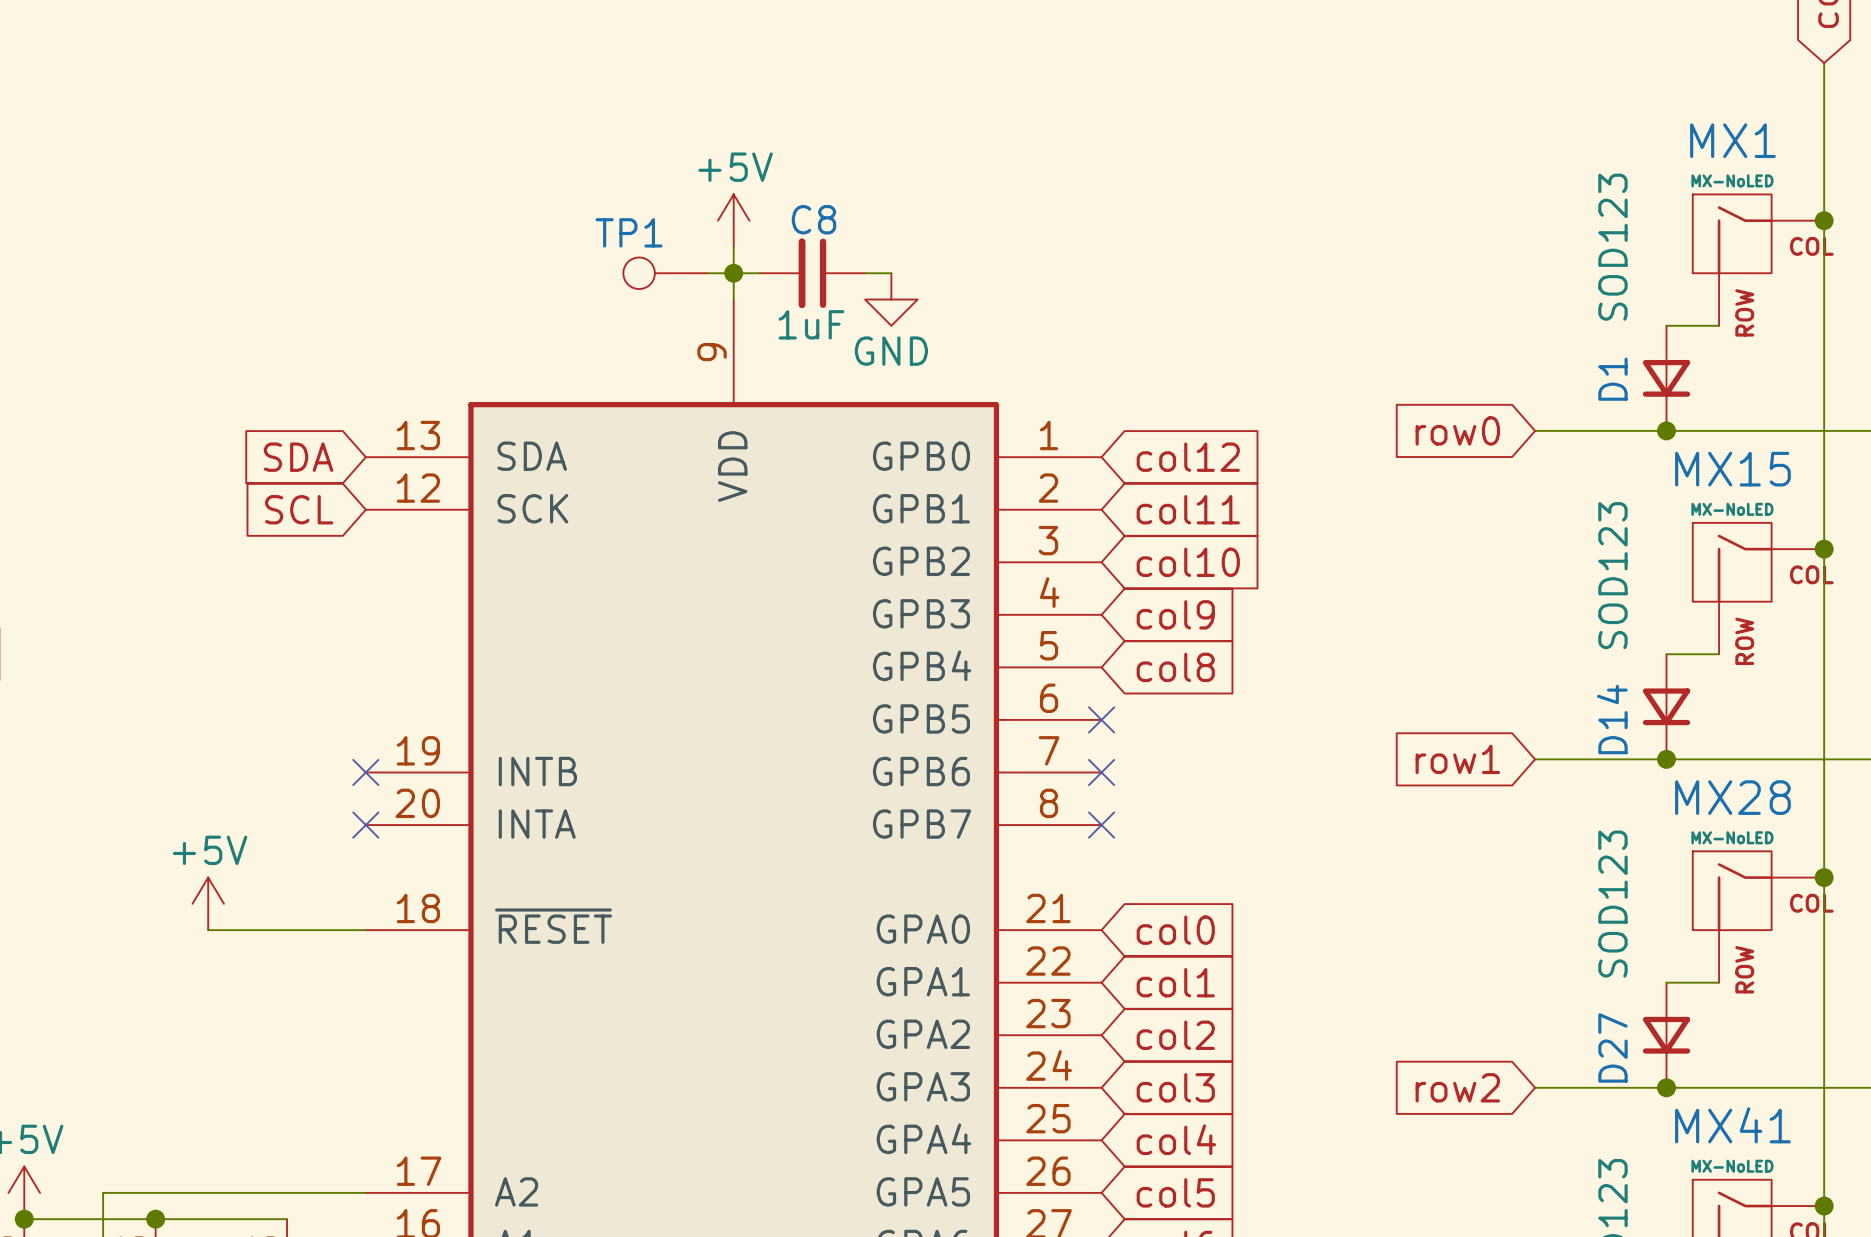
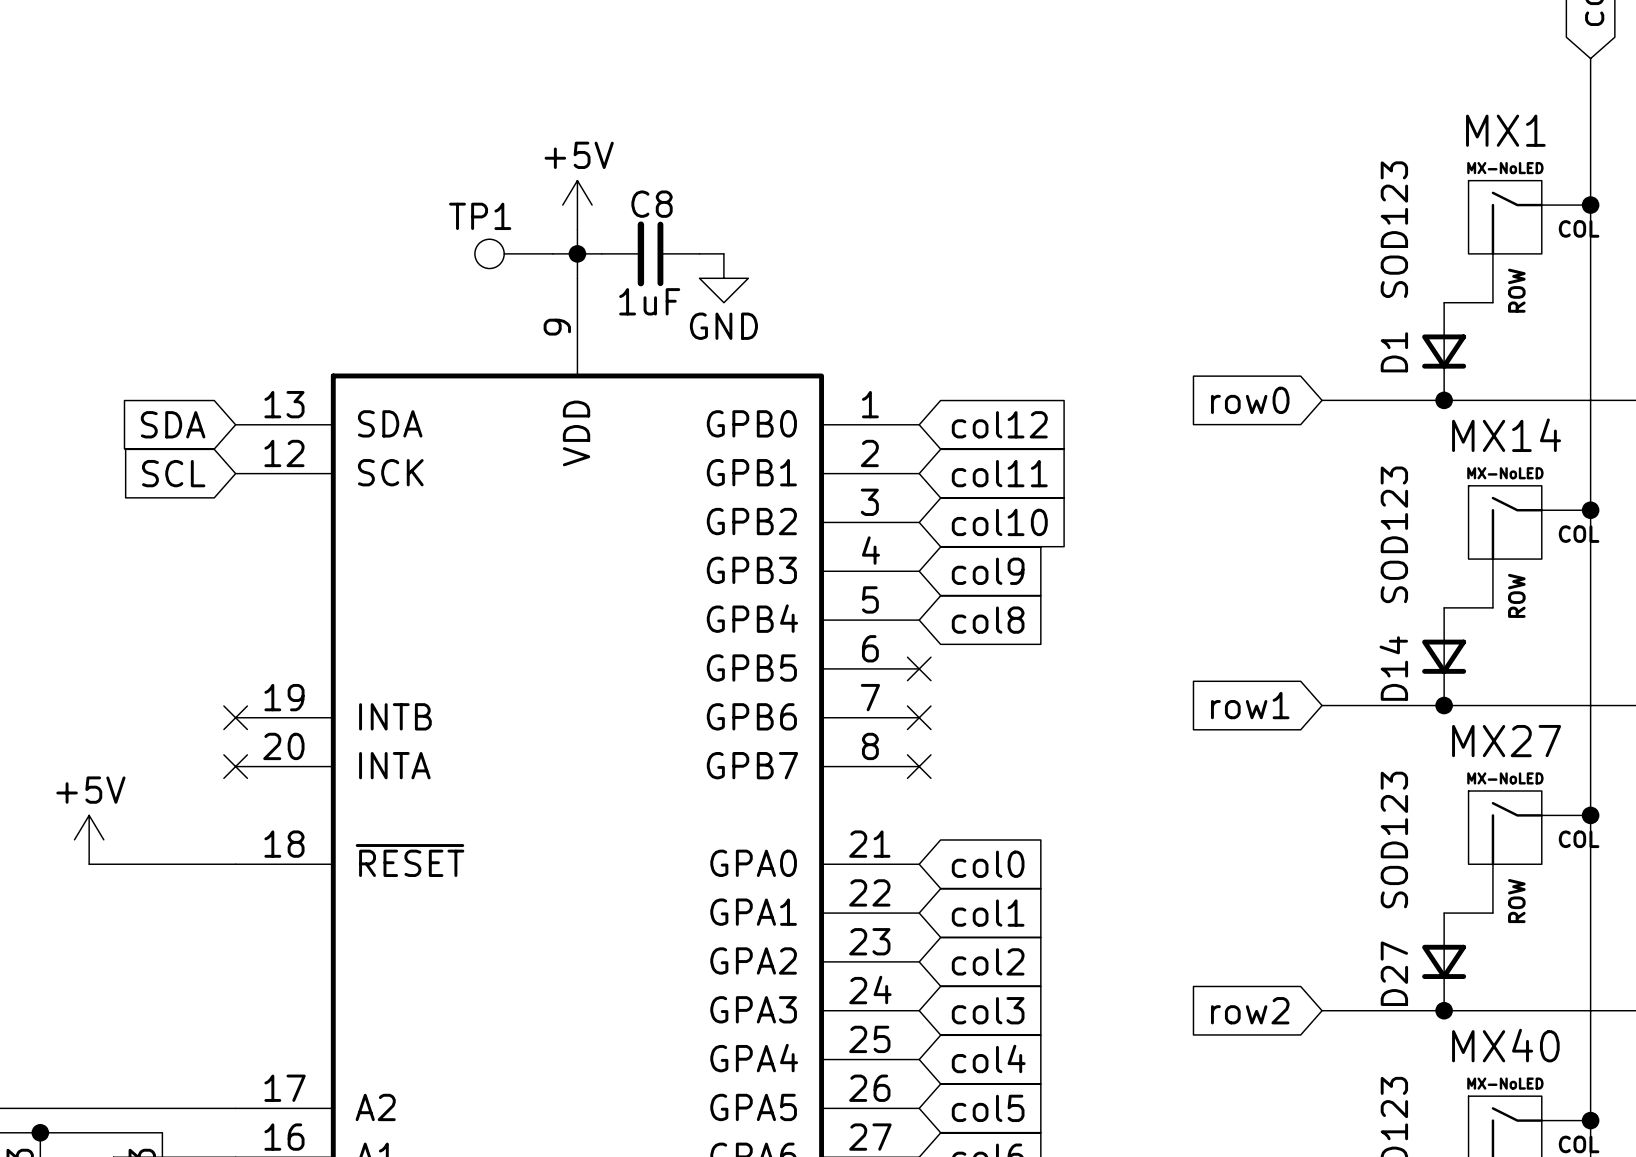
MX15 name: MX15 (1732, 469) -> MX14 (1506, 435)
MX28 name: MX28 (1732, 797) -> MX27 (1506, 741)
MX41 name: MX41 (1732, 1125) -> MX40 (1505, 1045)

